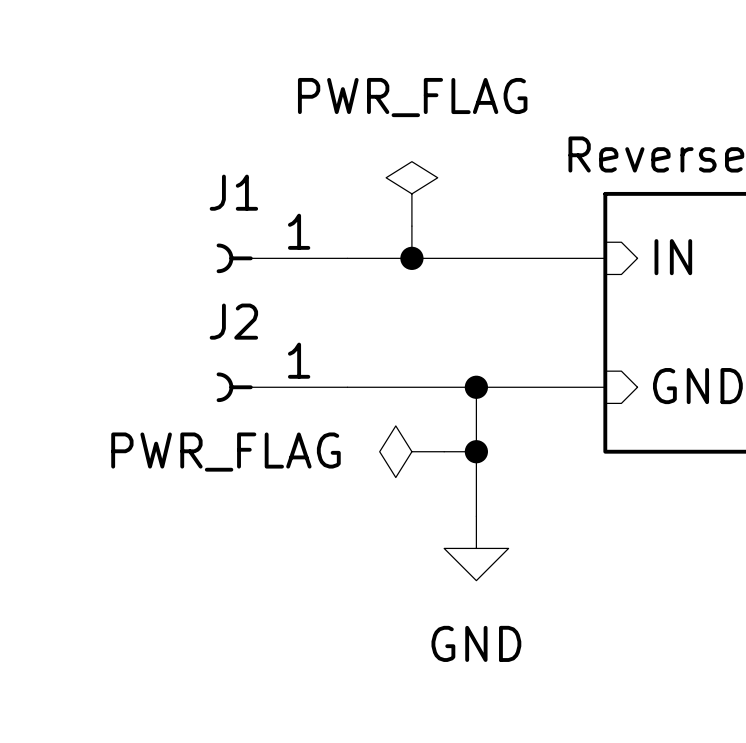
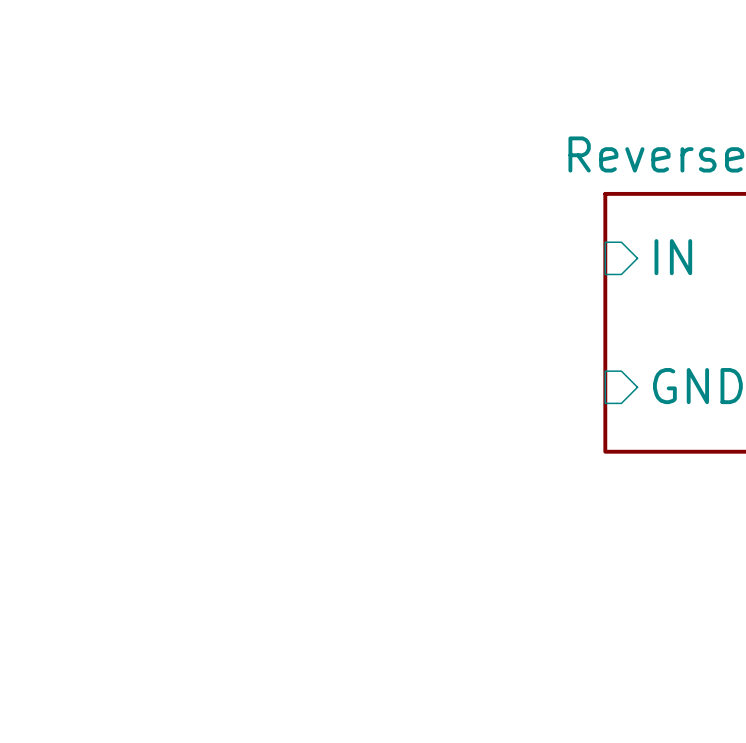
power symbol: PWR_FLAG (411, 193) -> none
wire: (411, 226) (411, 258) -> none
J1: (282, 258) -> none
wire: (347, 258) (605, 258) -> none
junction: (411, 258) -> none
J2: (282, 387) -> none
wire: (347, 387) (605, 387) -> none
wire: (476, 387) (476, 516) -> none
junction: (476, 387) -> none
power symbol: PWR_FLAG (411, 451) -> none
wire: (444, 451) (476, 451) -> none
junction: (476, 451) -> none
power symbol: GND (476, 548) -> none

